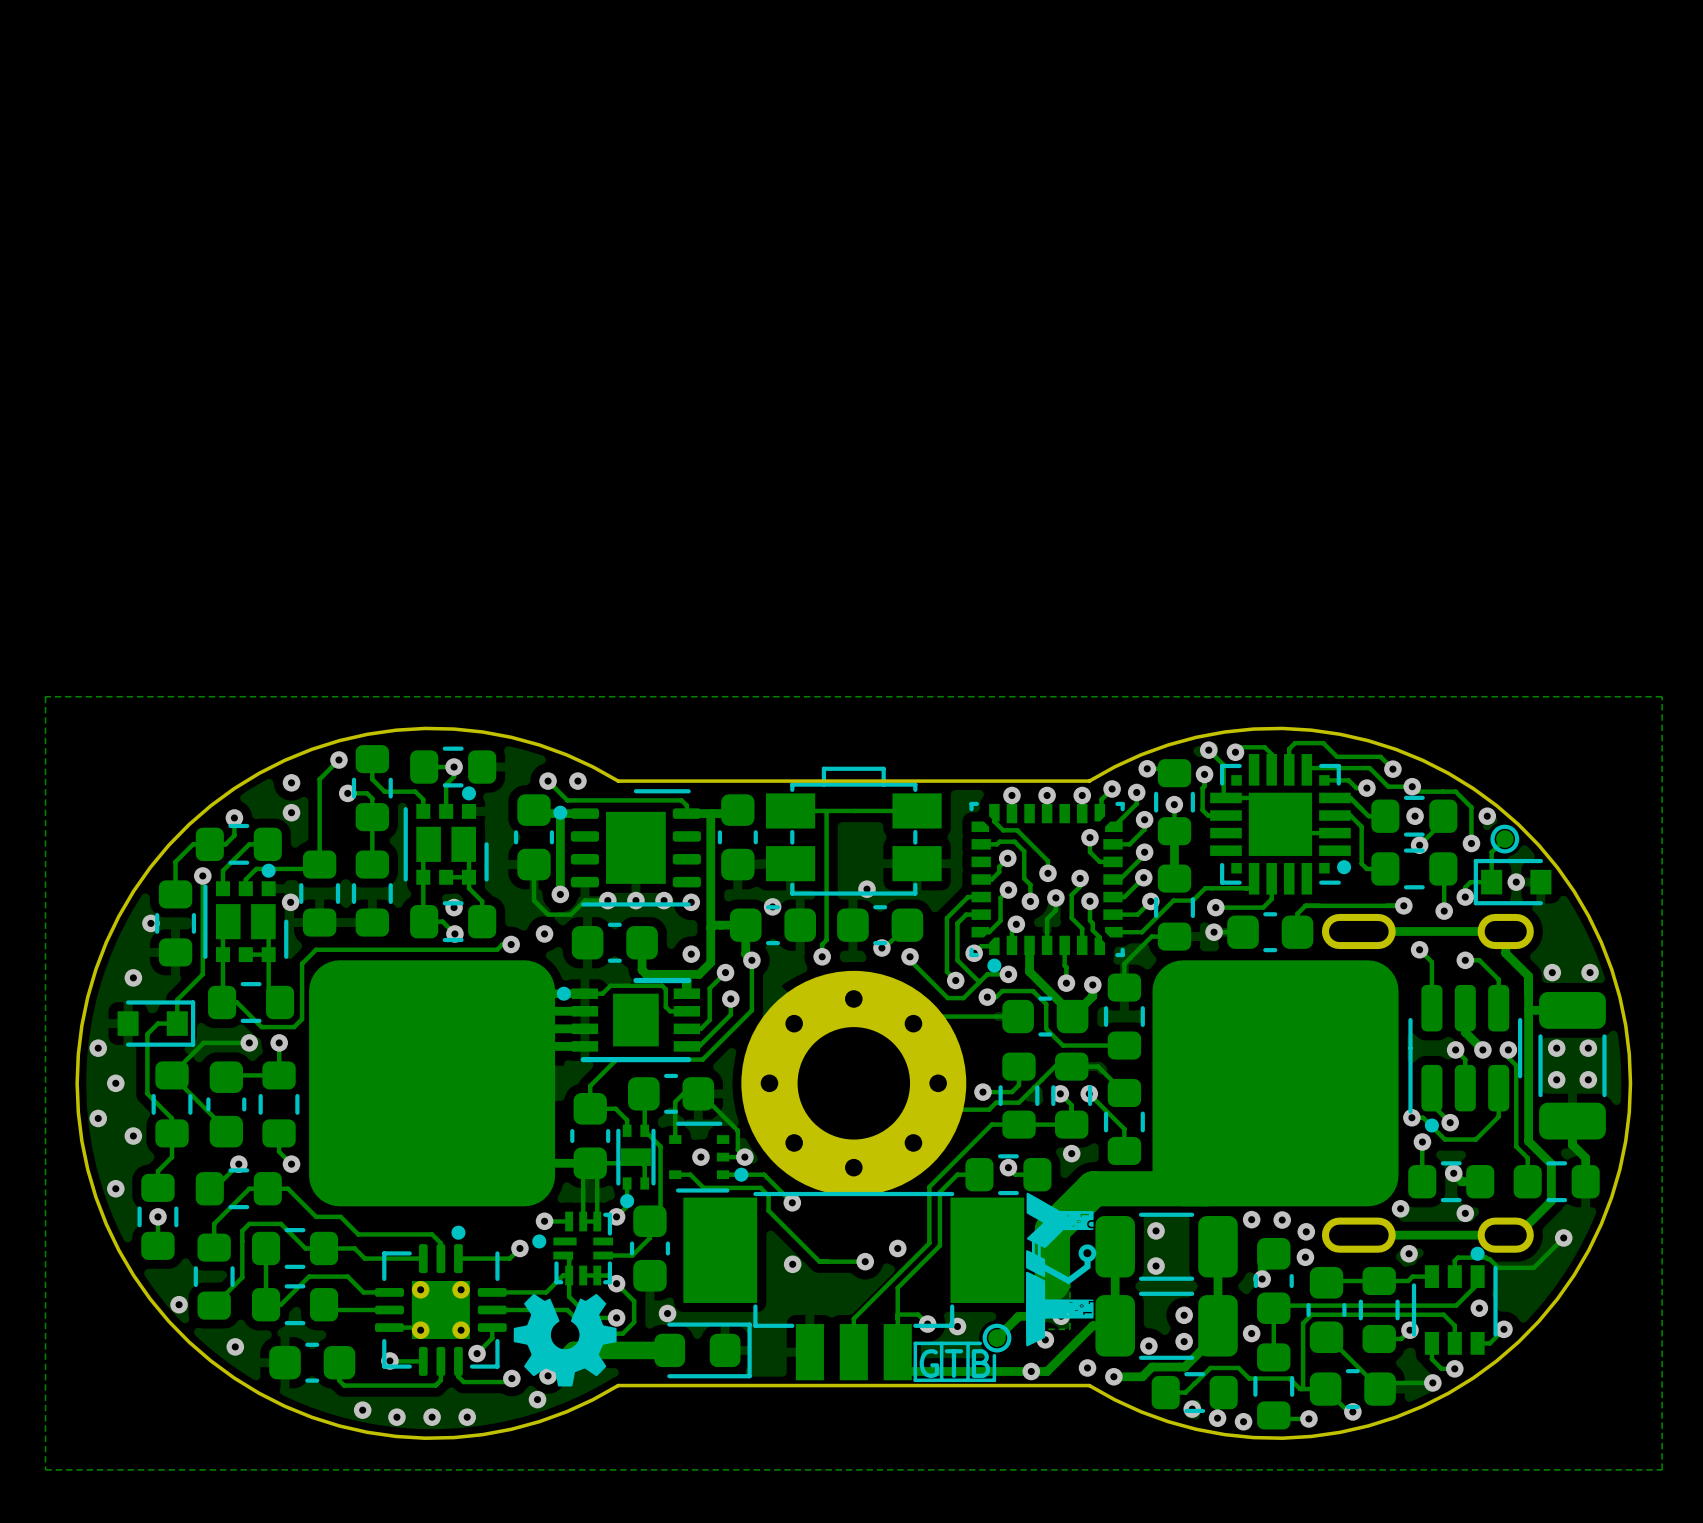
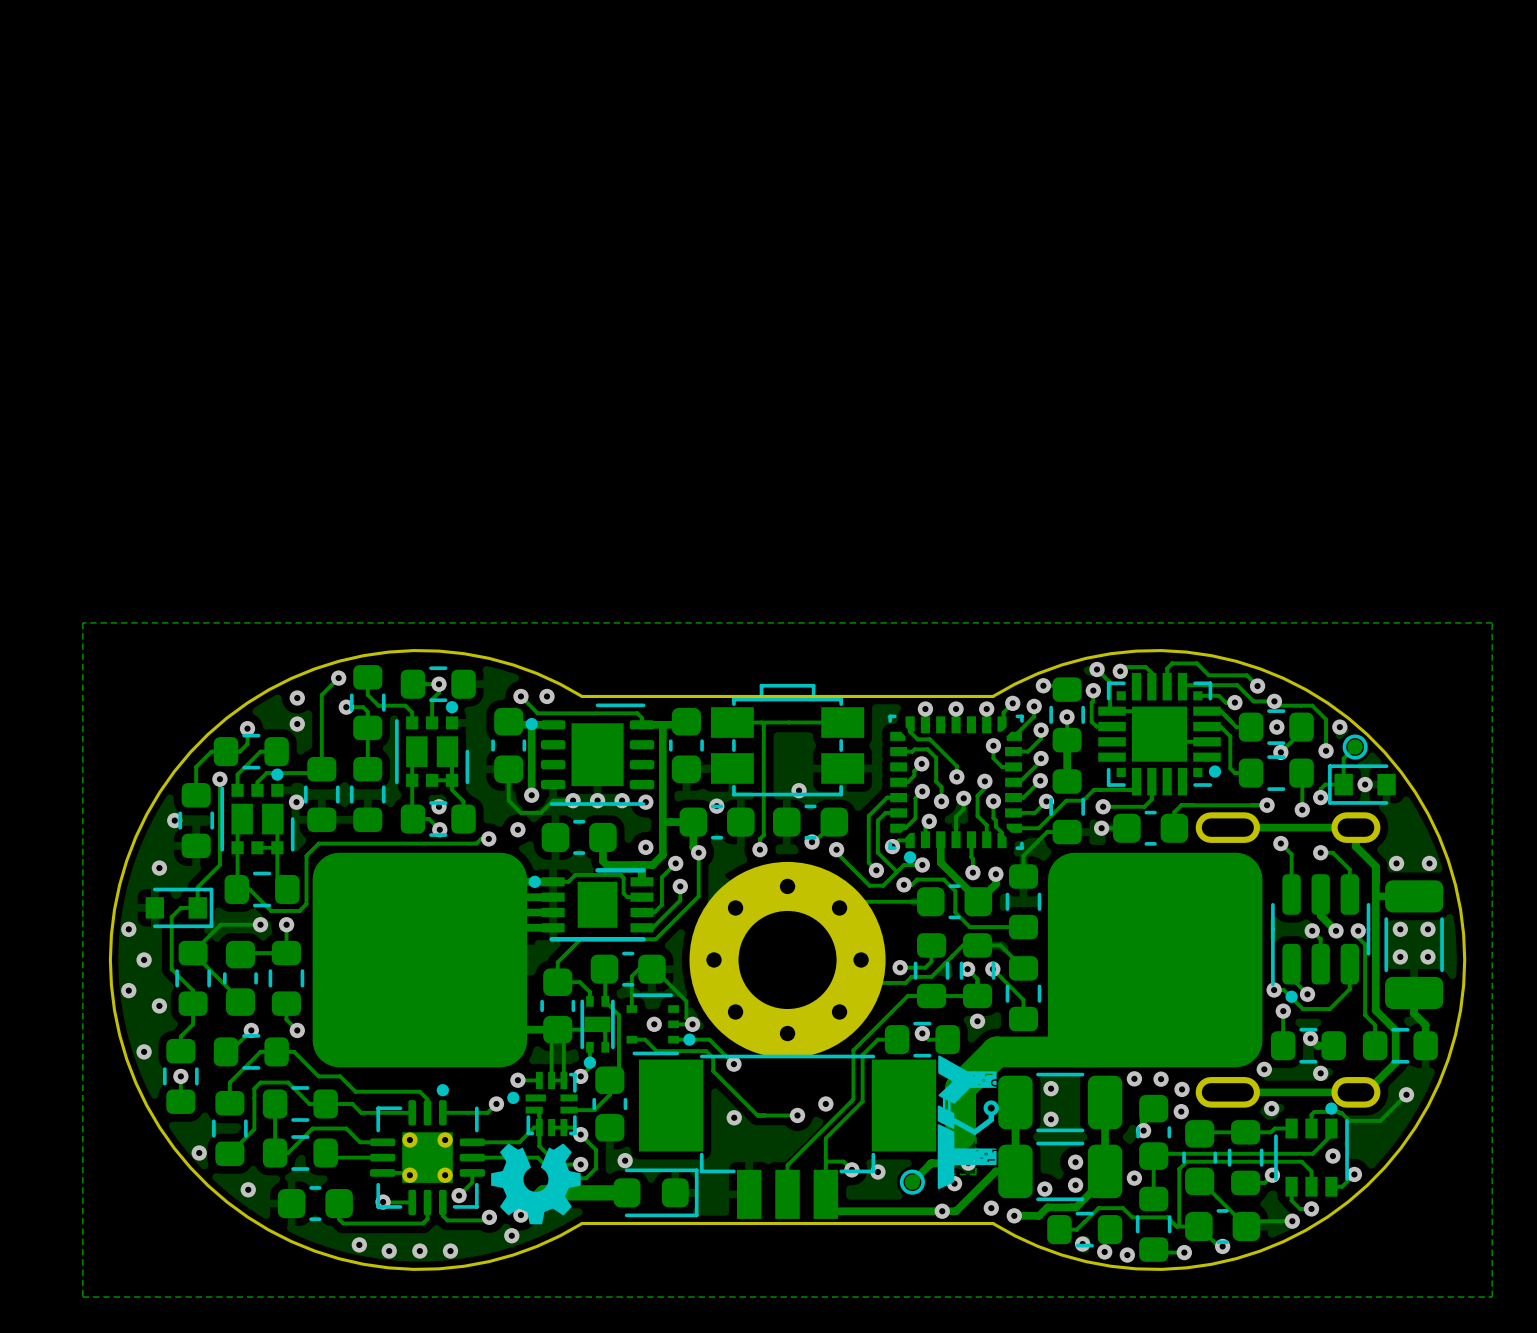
line: (941, 1343) (941, 1380) -> none
line: (968, 1343) (968, 1380) -> none
line: (980, 1343) (915, 1343) (915, 1380) (994, 1380) (994, 1355) -> none
text: G (929, 1363) -> none
text: T (953, 1363) -> none
text: B (980, 1363) -> none

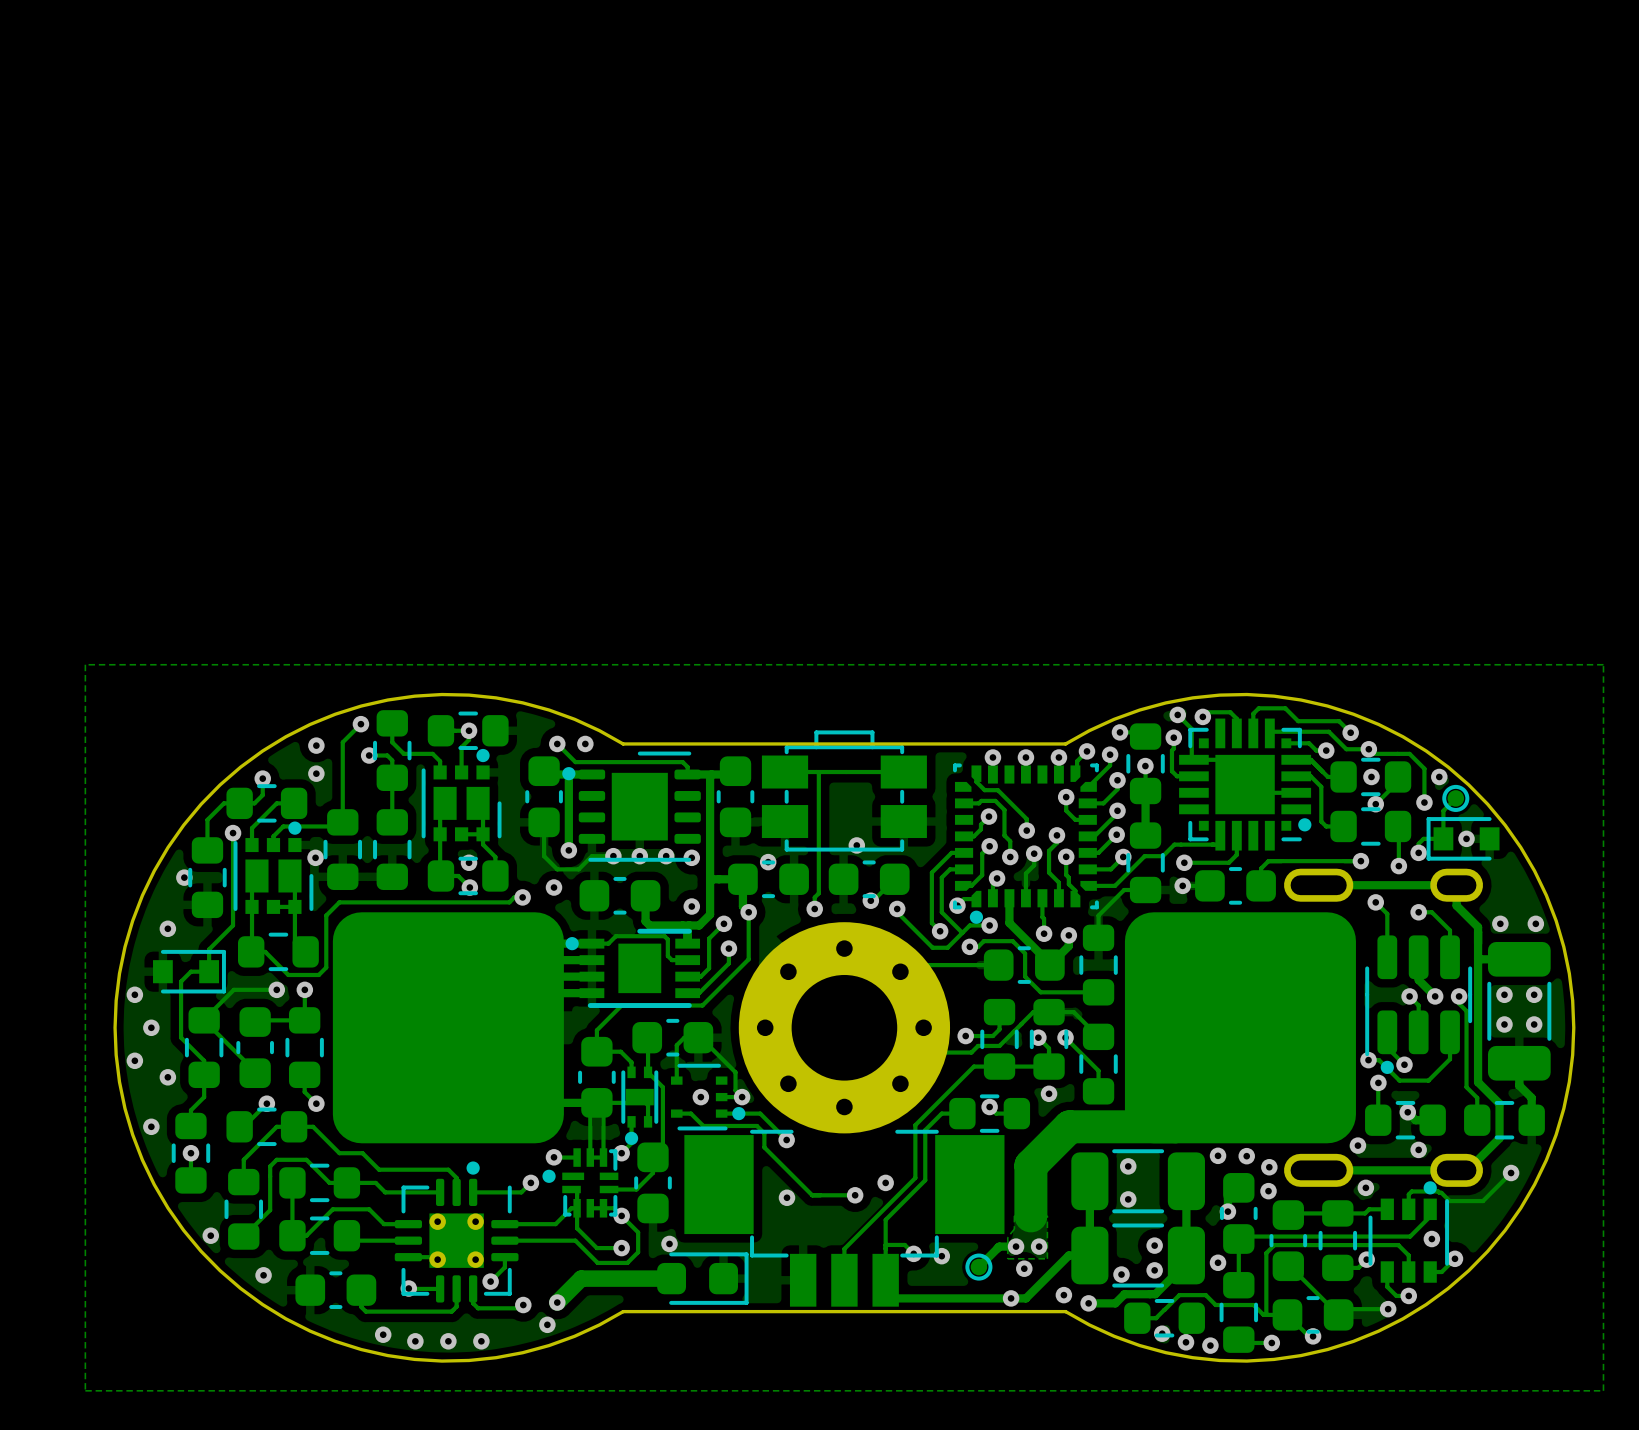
part footprint: [638, 1054, 937, 1219] -> [684, 1129, 1005, 1307]
drawing: [937, 1055, 999, 1190] -> none
drawing: [491, 1143, 581, 1225] -> none

